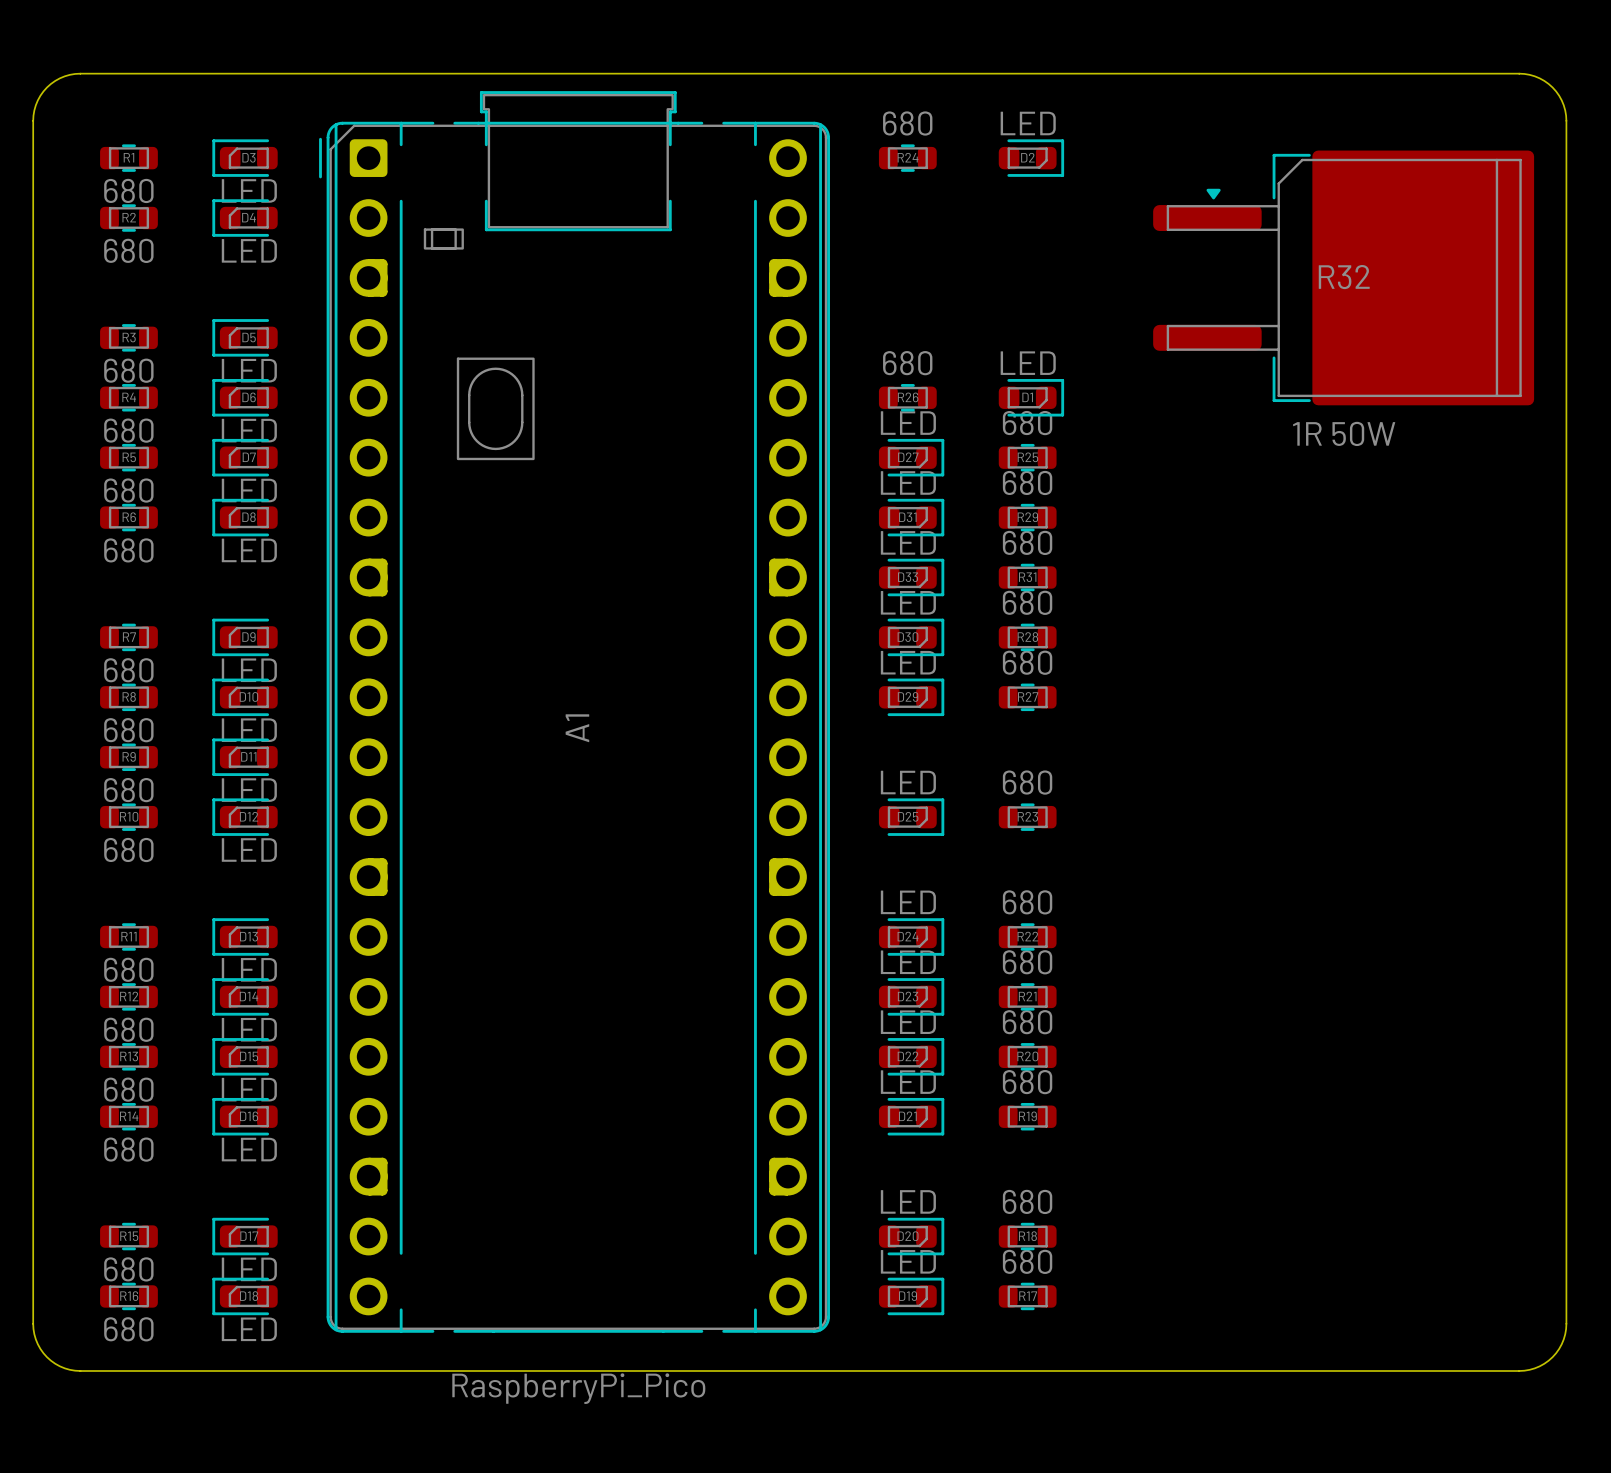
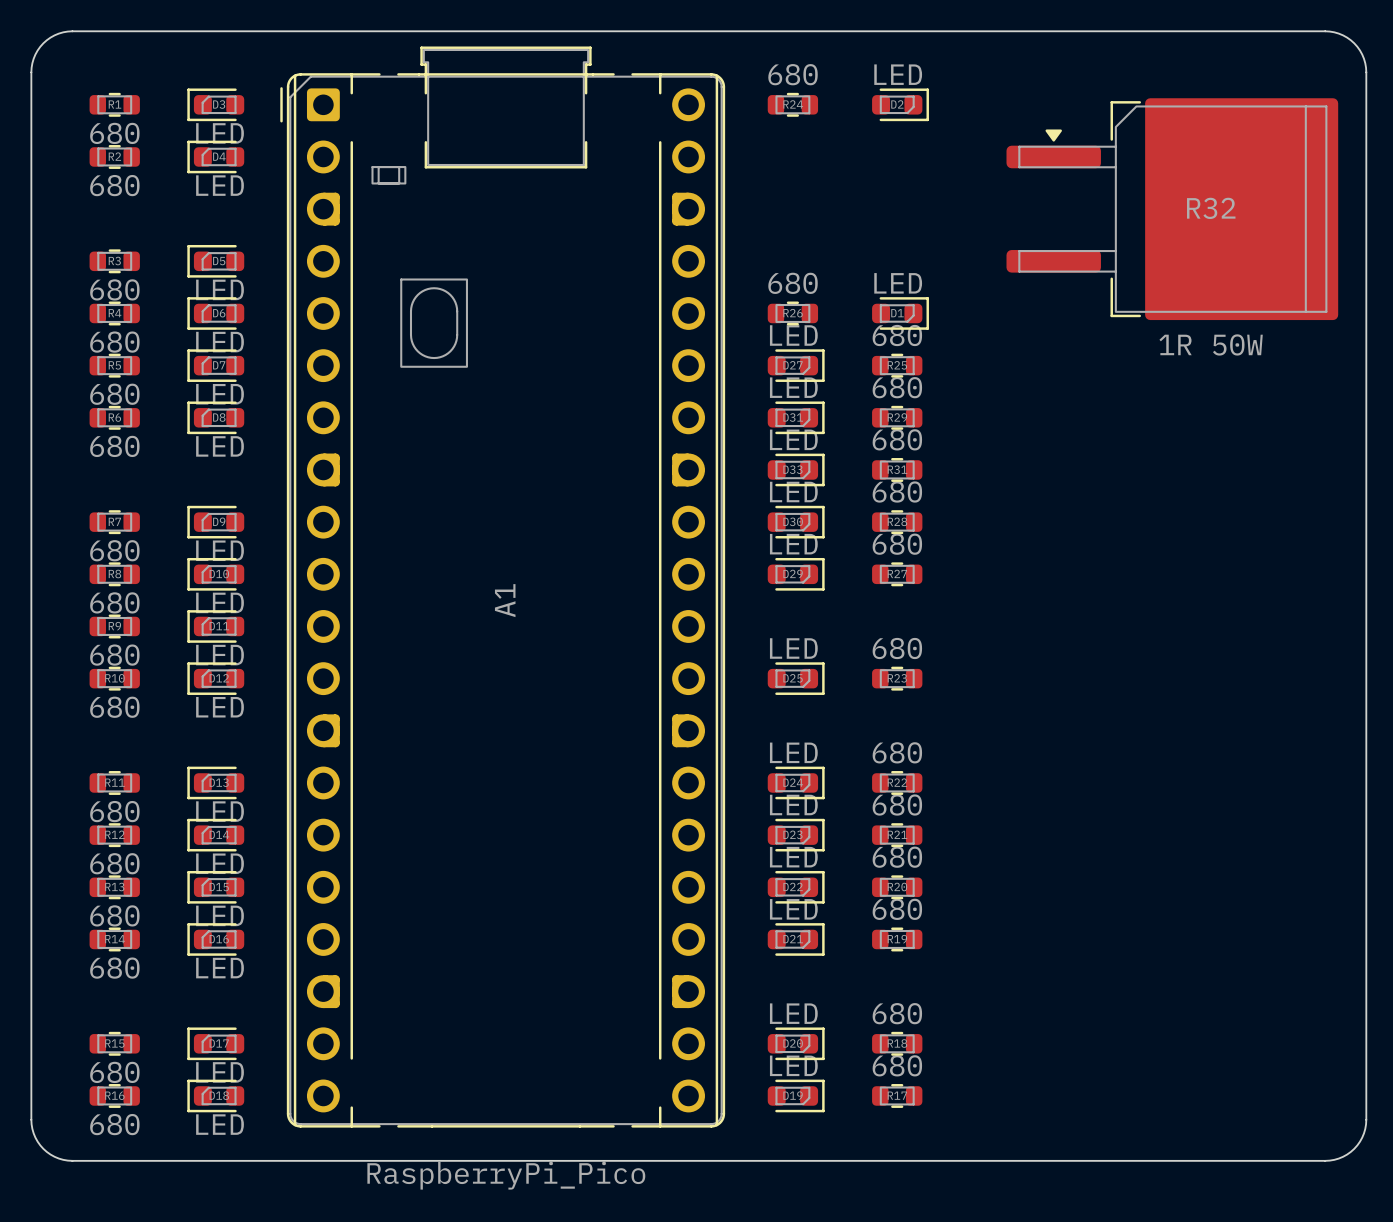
R32 footprint: [1153, 150, 1535, 406] -> [1006, 98, 1339, 321]
R32 name position: R32 (1344, 277) -> R32 (1211, 208)
R32 value position: 1R 50W (1344, 433) -> 1R 50W (1211, 344)

